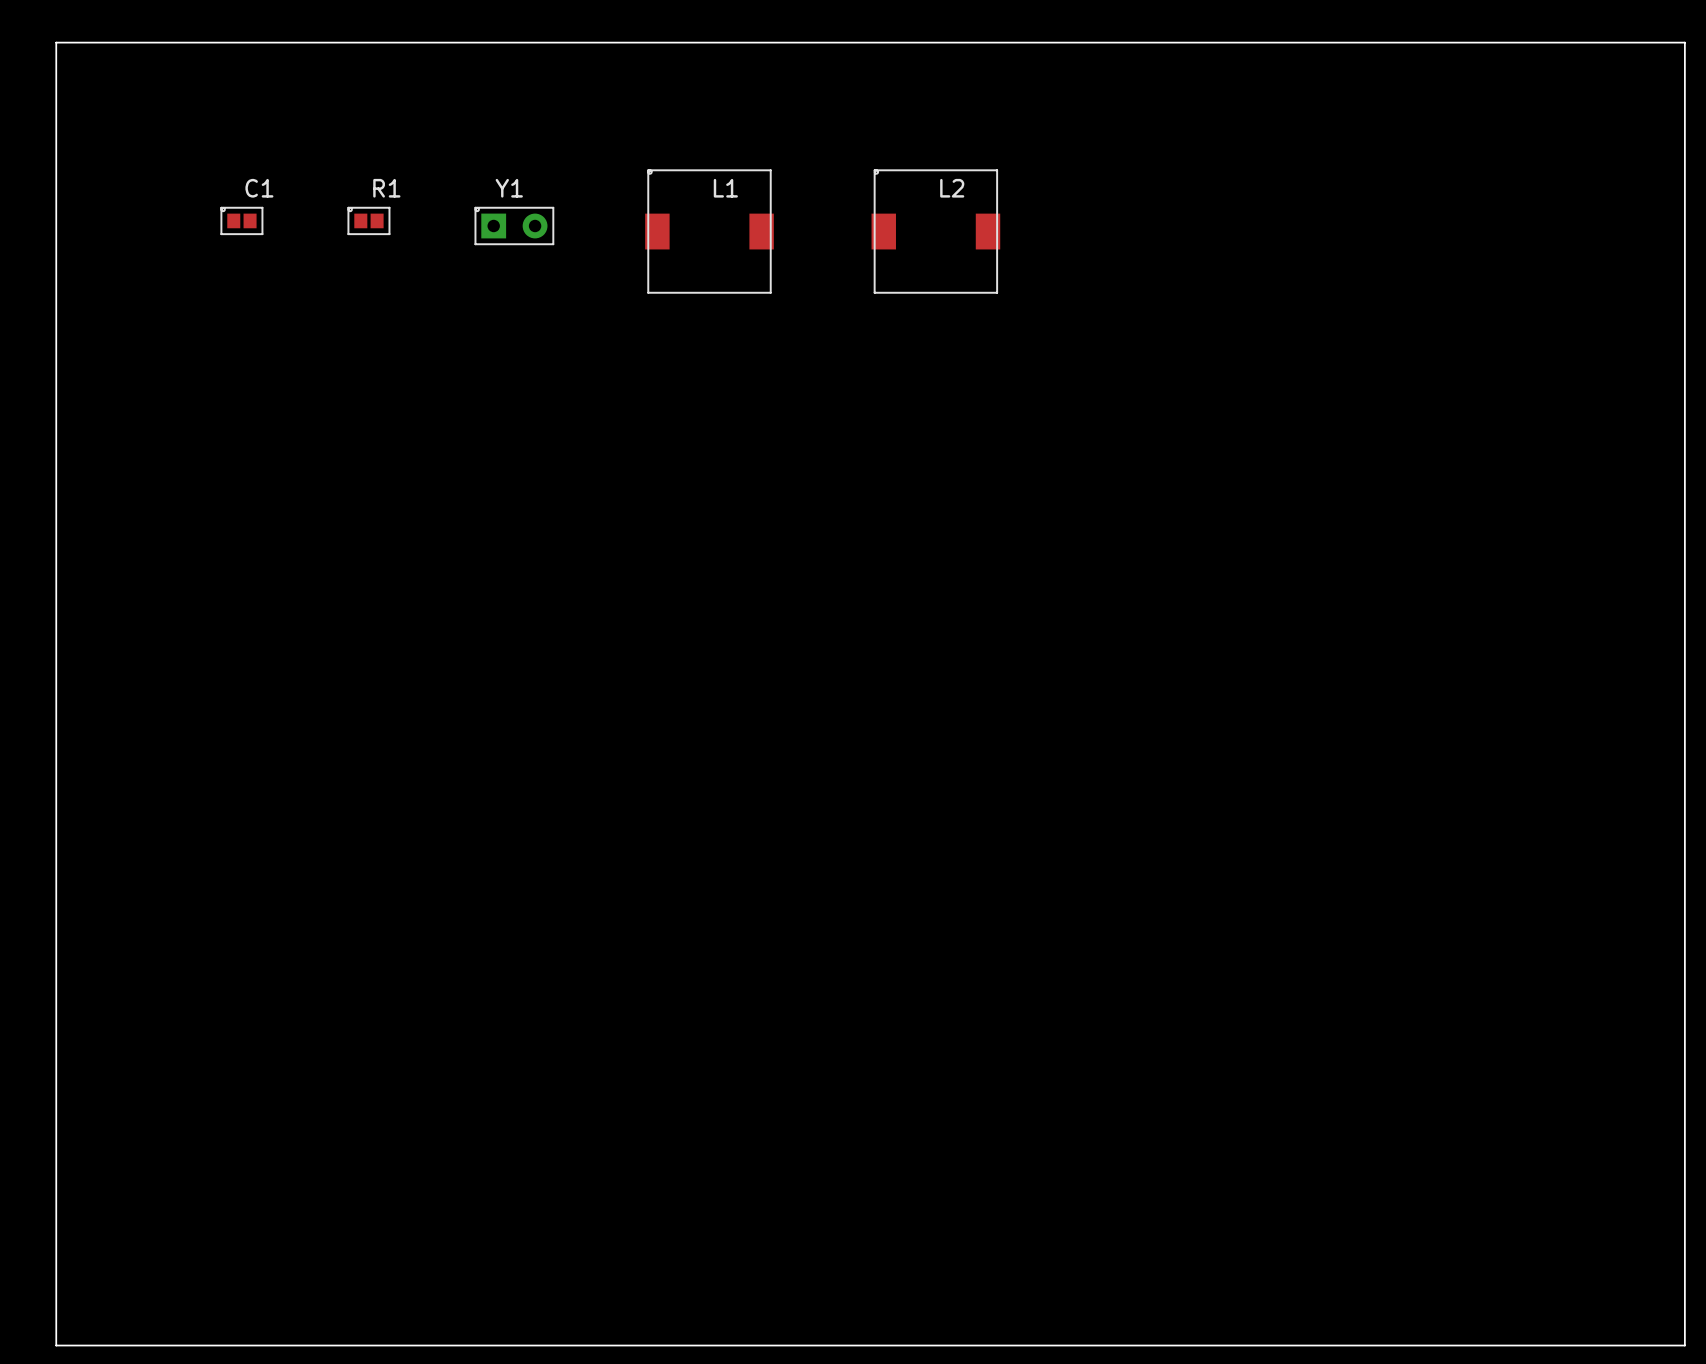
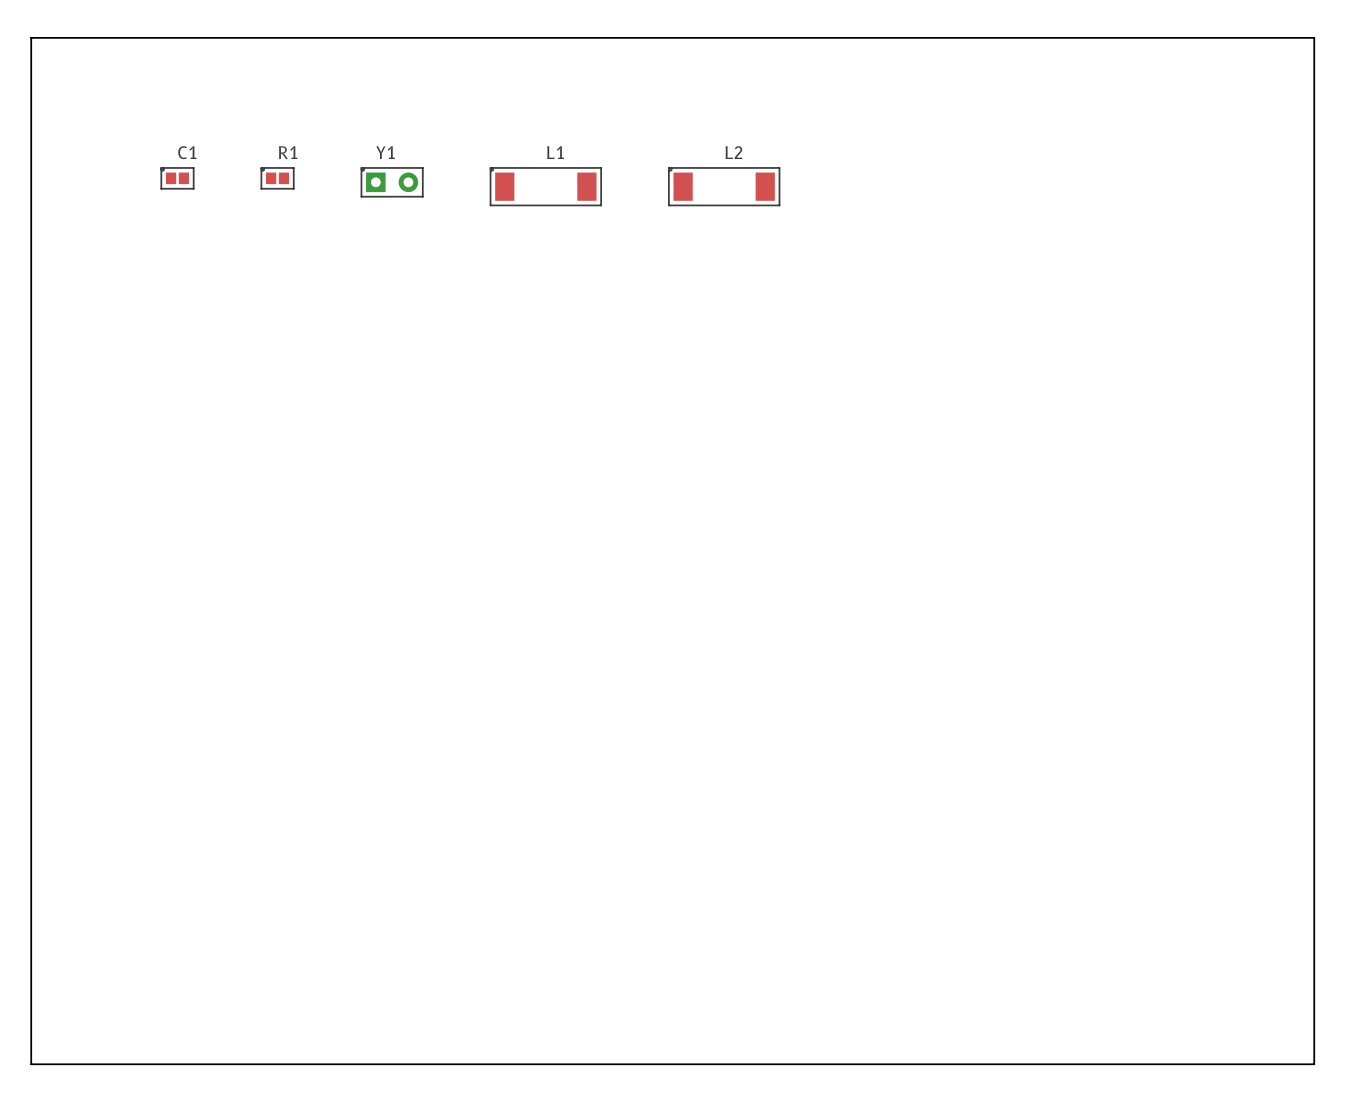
L1 footprint: [645, 169, 774, 294] -> [489, 167, 602, 207]
L2 footprint: [871, 169, 1001, 294] -> [668, 167, 781, 207]

